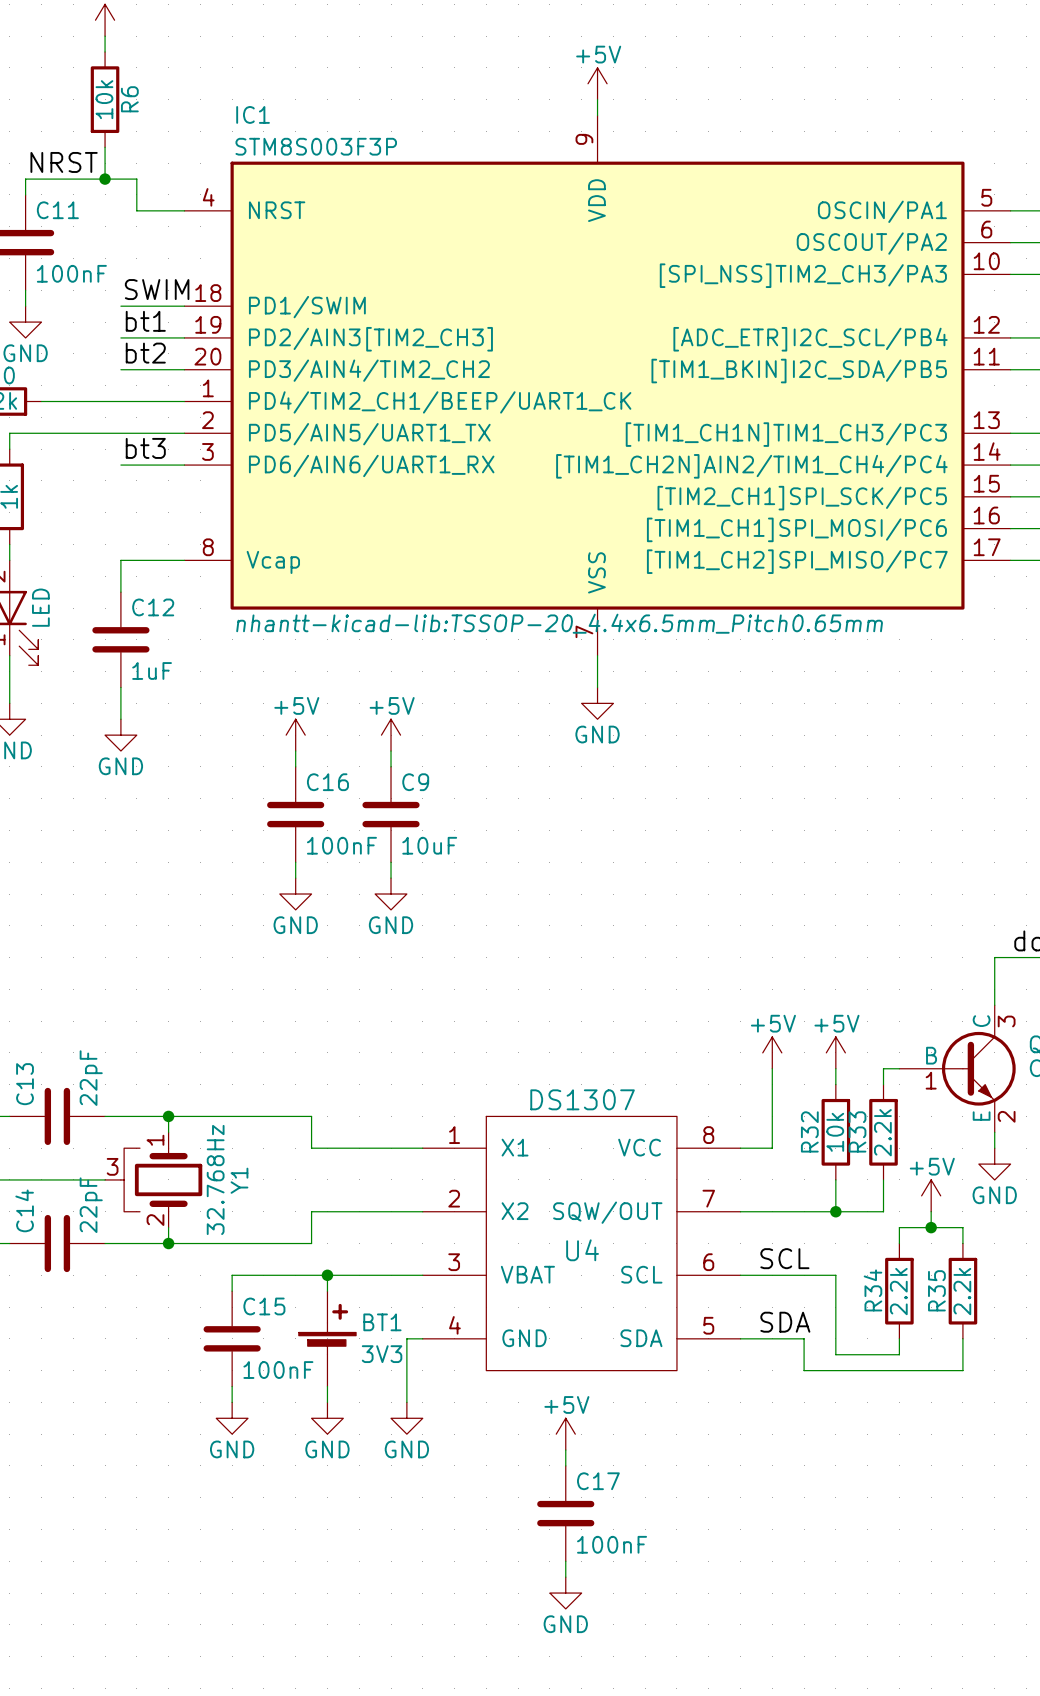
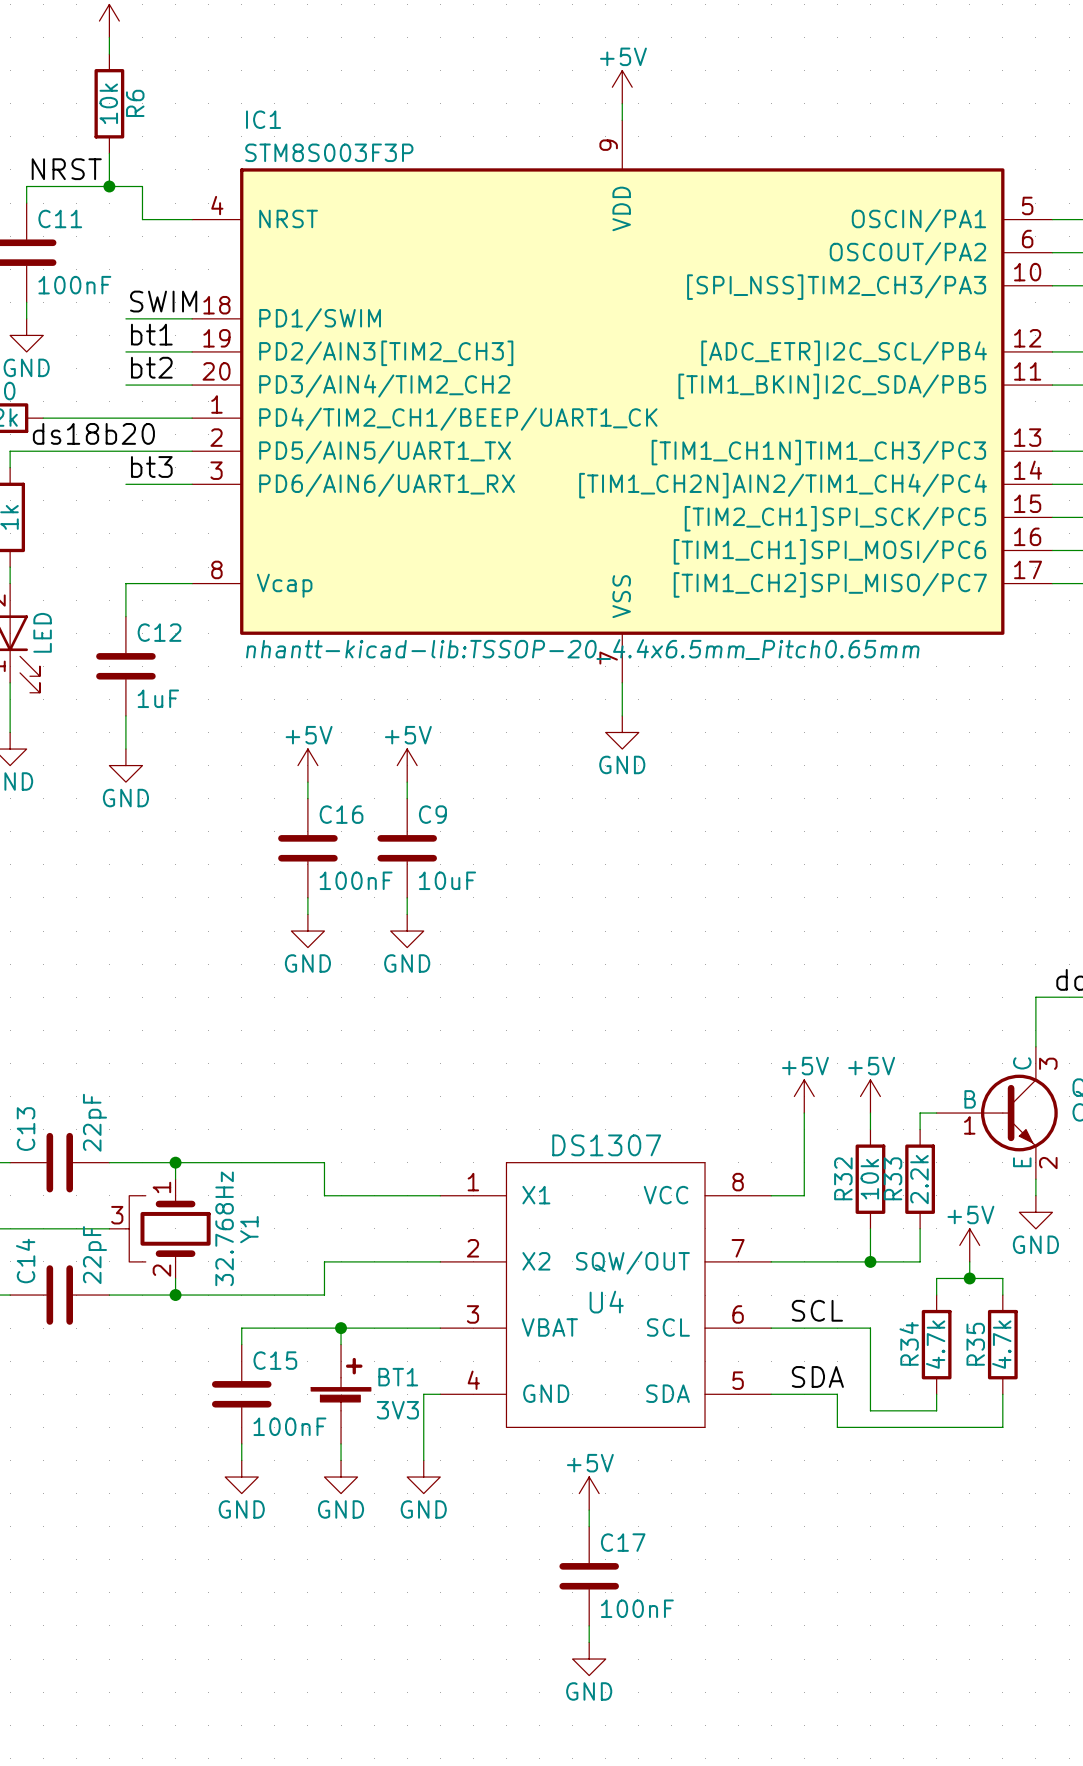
label: none -> ds18b20 (93, 433)
R34 value: 2.2k (898, 1291) -> 4.7k (935, 1344)
R35 value: 2.2k (962, 1291) -> 4.7k (1001, 1344)

